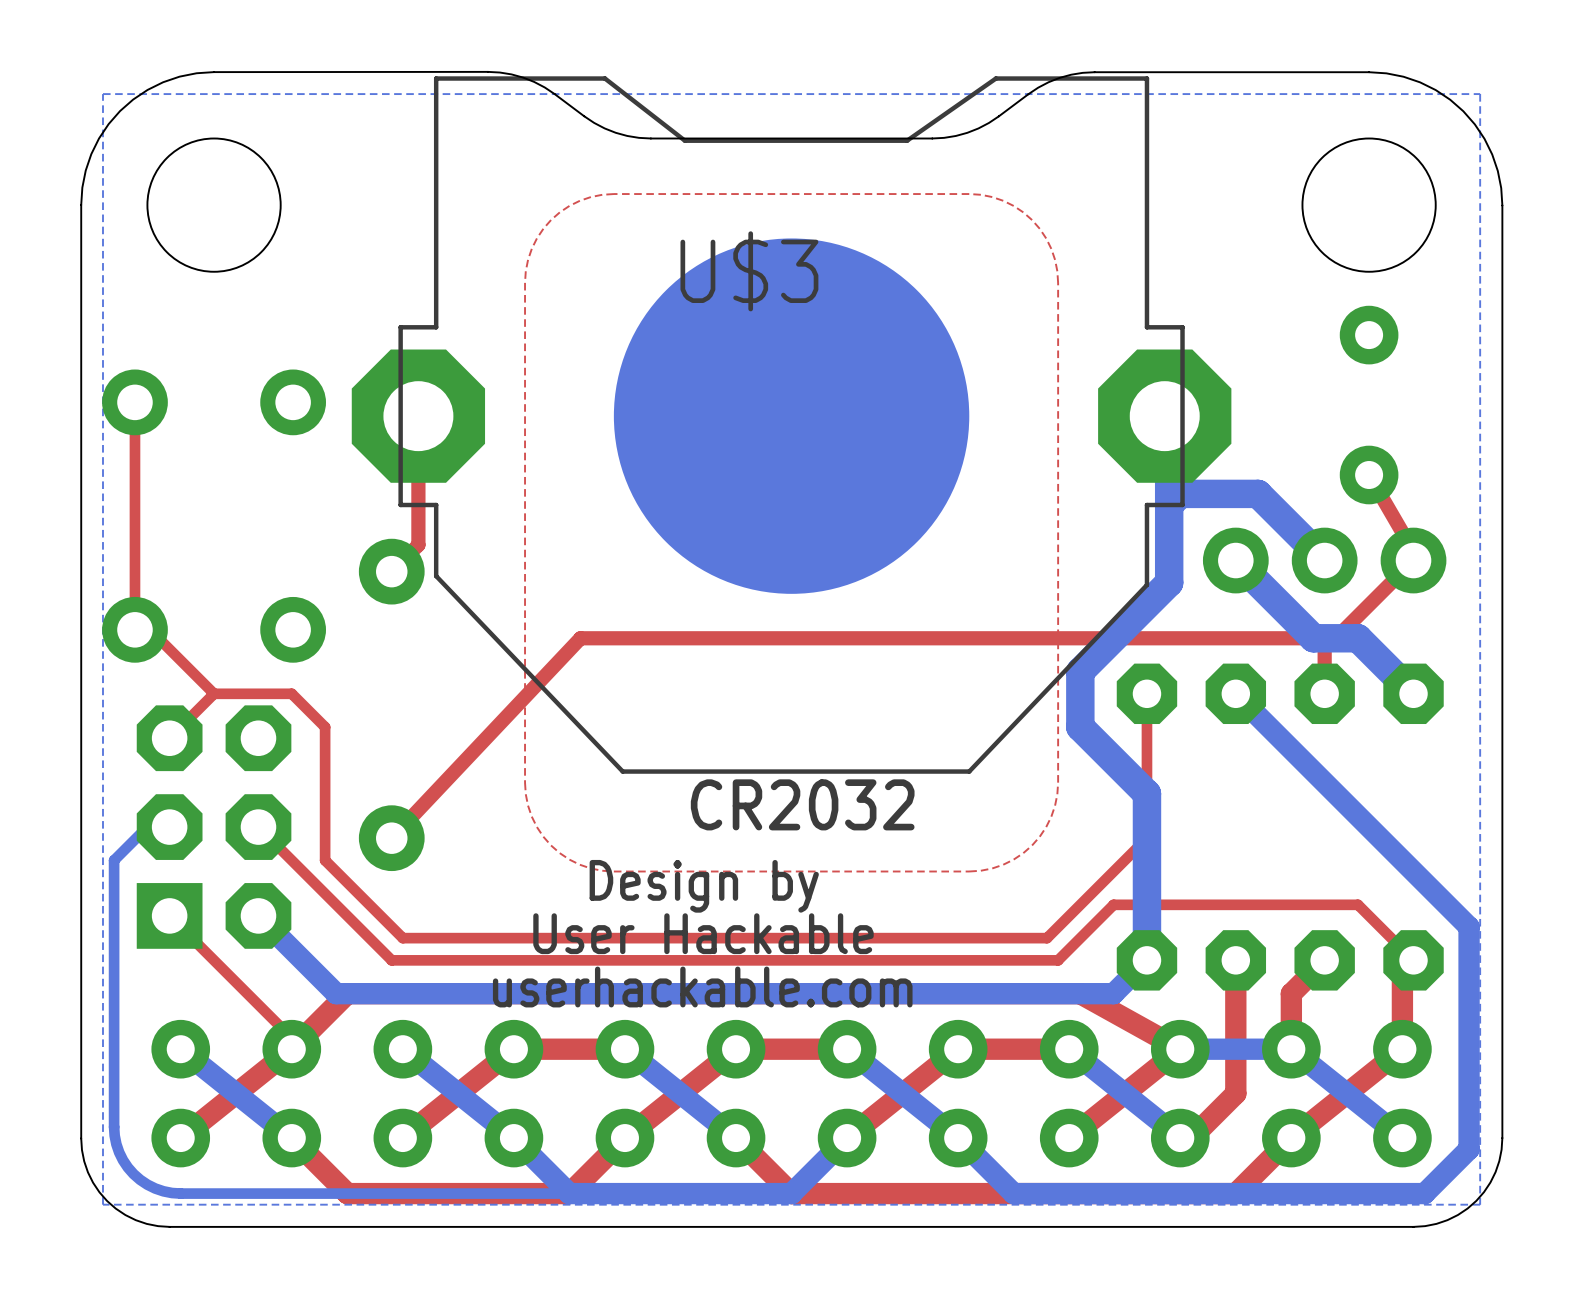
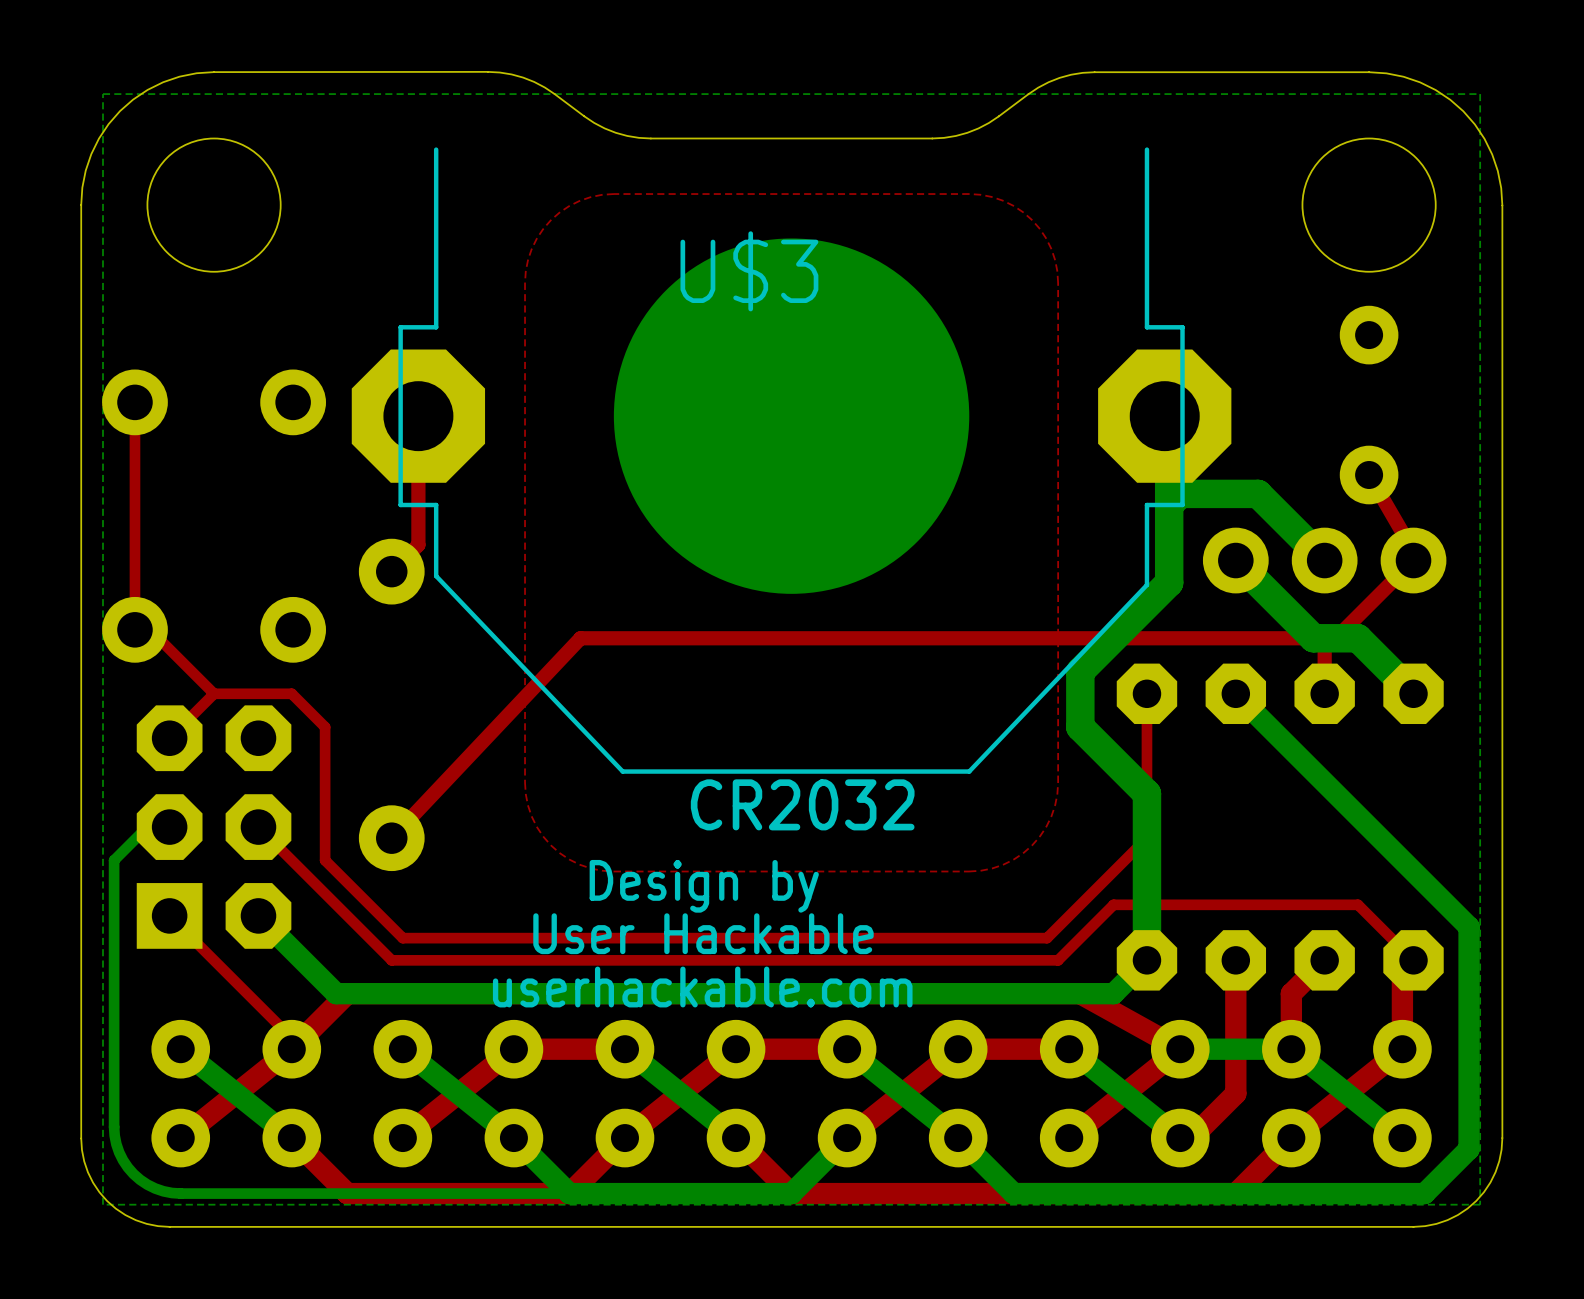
U$3 footprint: [351, 76, 1232, 774] -> [351, 147, 1232, 774]

